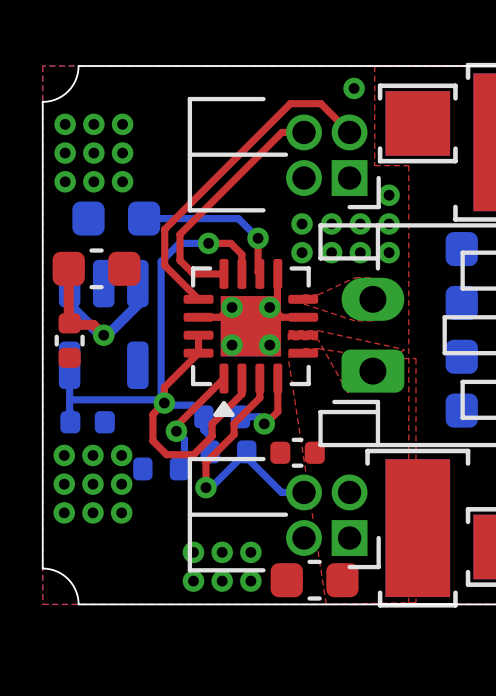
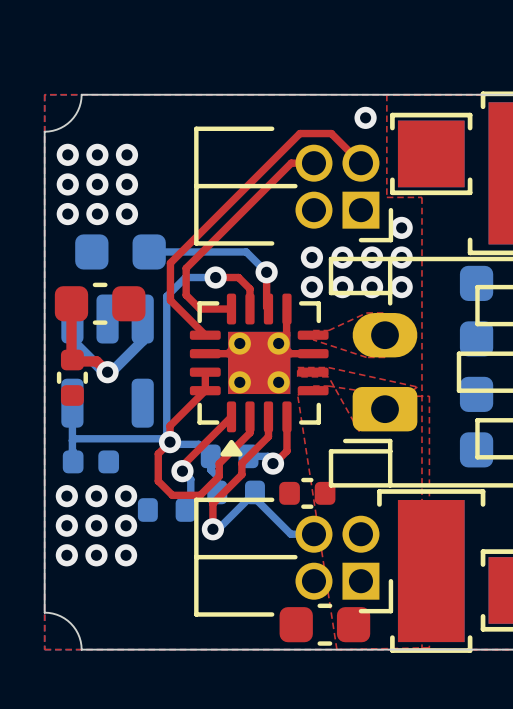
via: (193, 552) -> none
via: (222, 552) -> none
via: (250, 552) -> none
via: (193, 581) -> none
via: (222, 581) -> none
via: (250, 581) -> none

